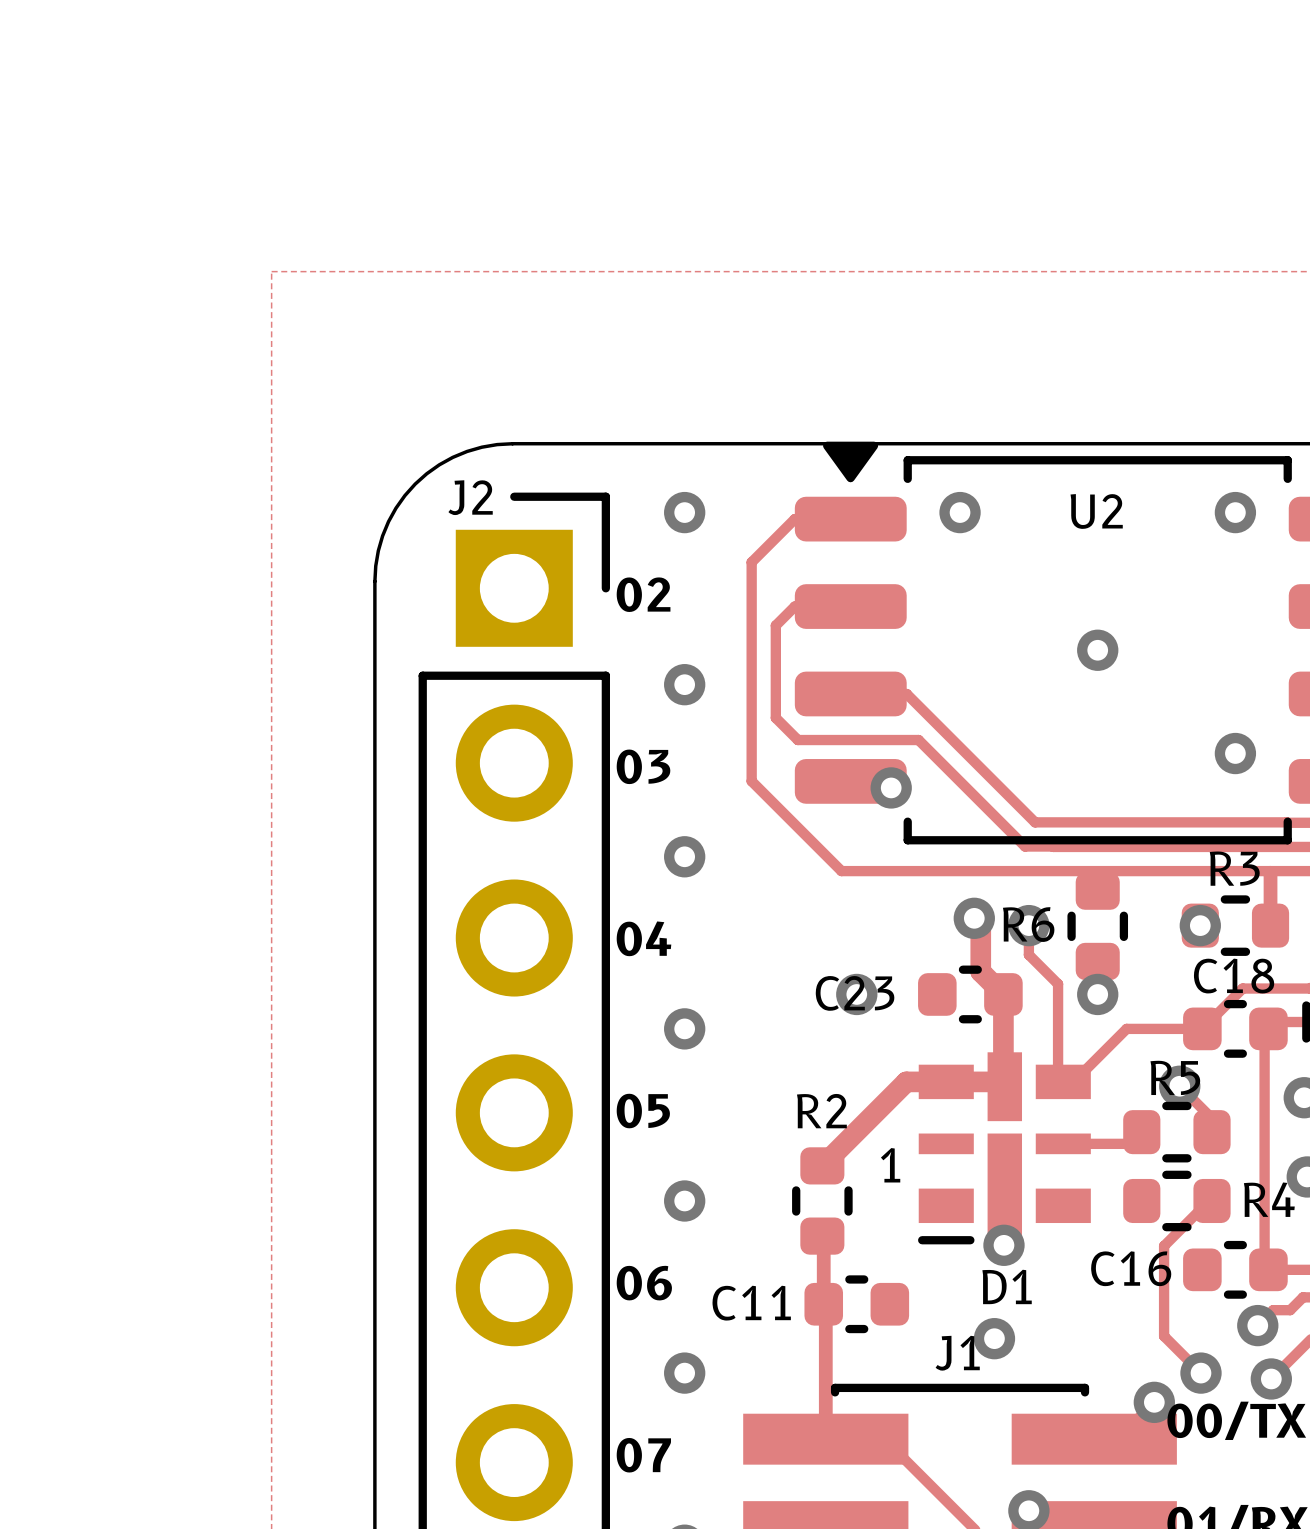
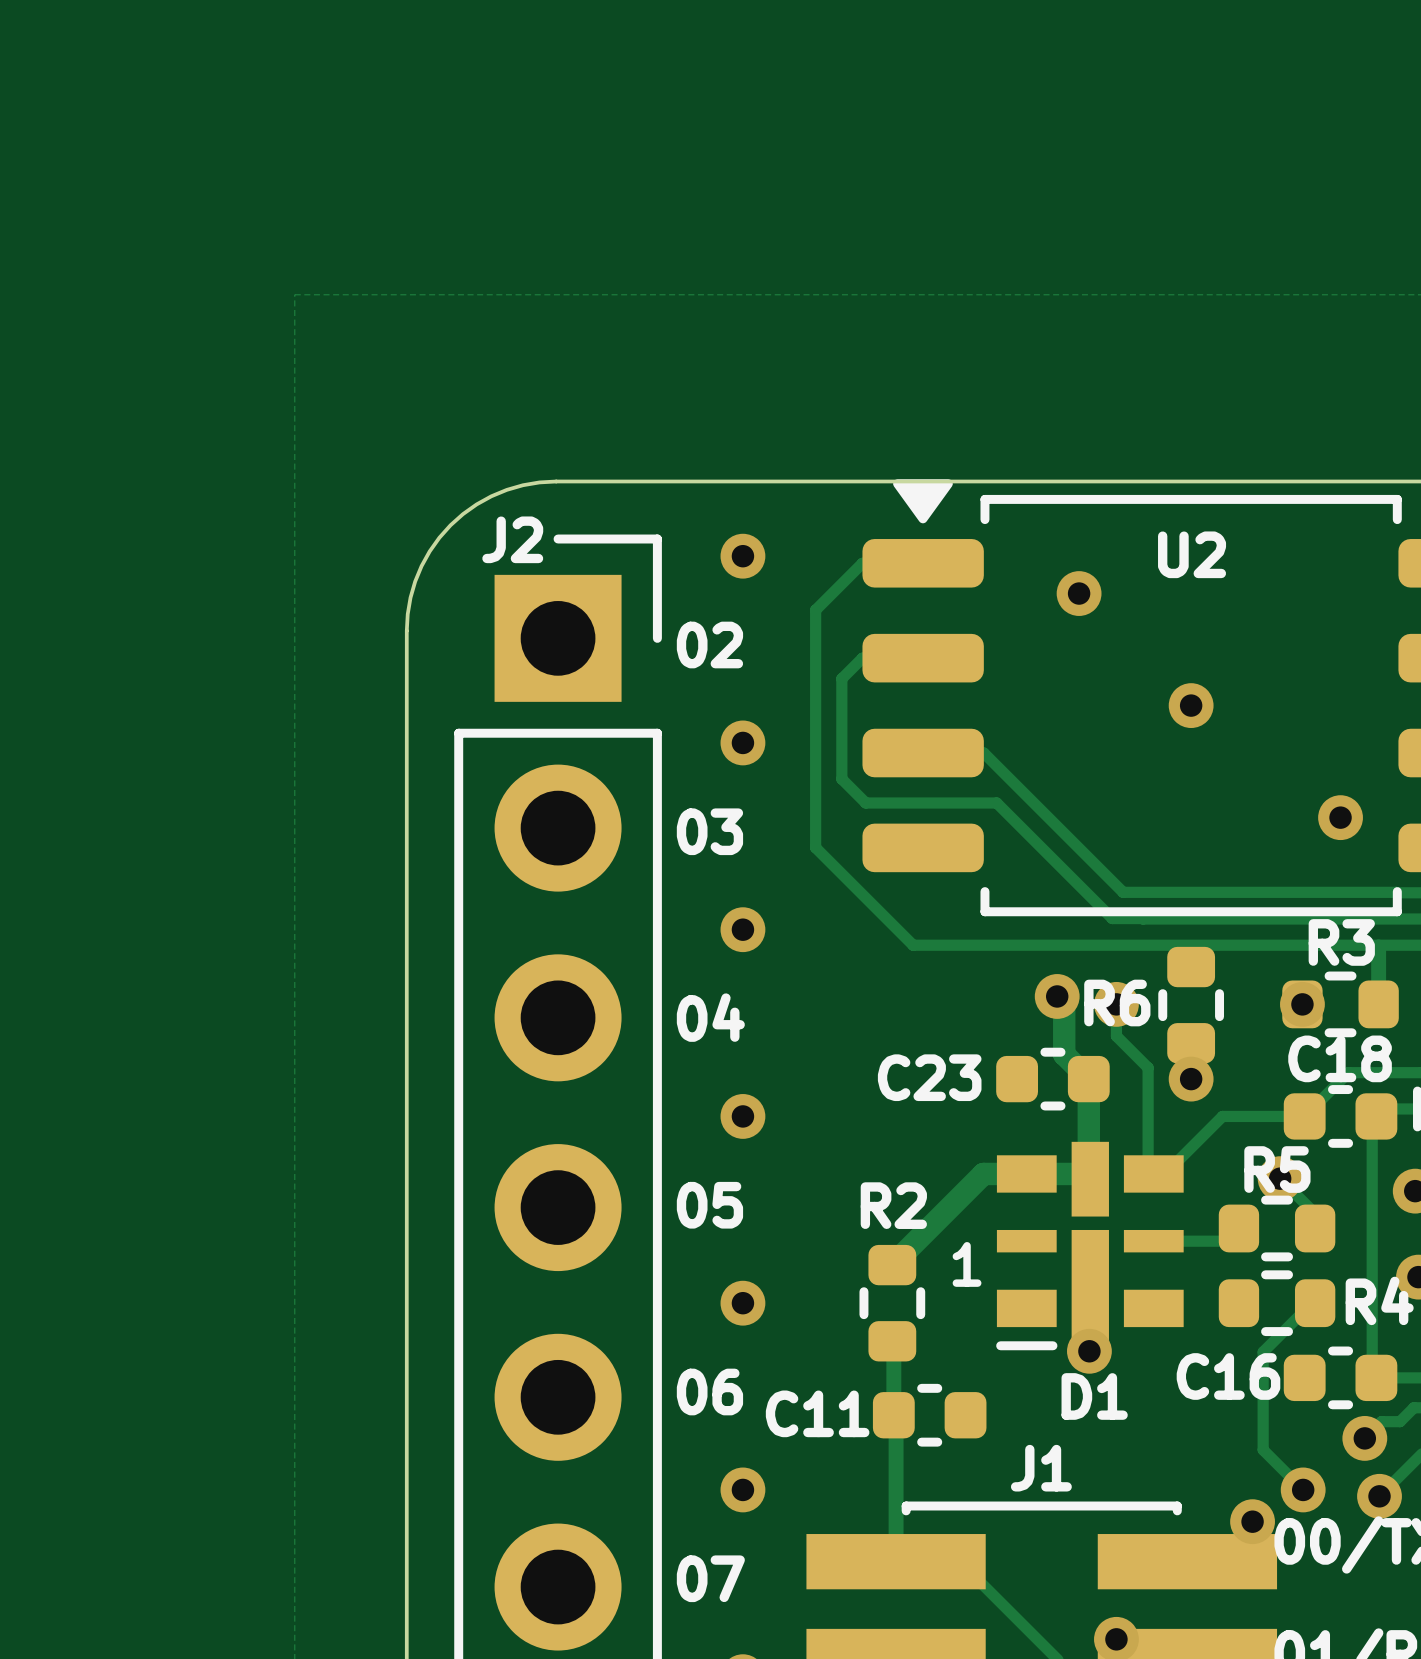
via position: (960, 512) -> (1079, 593)
via: (1235, 512) -> none
via: (891, 787) -> none
via: (856, 994) -> none
via: (994, 1338) -> none

